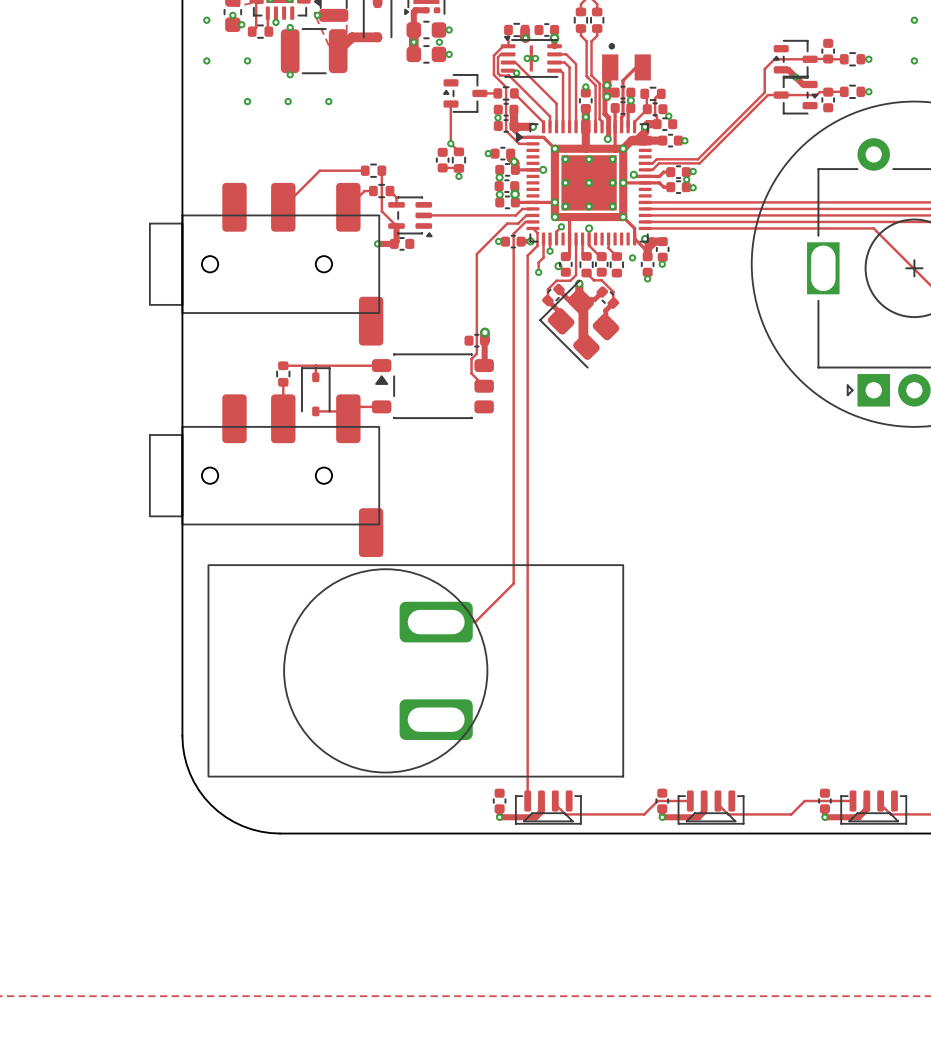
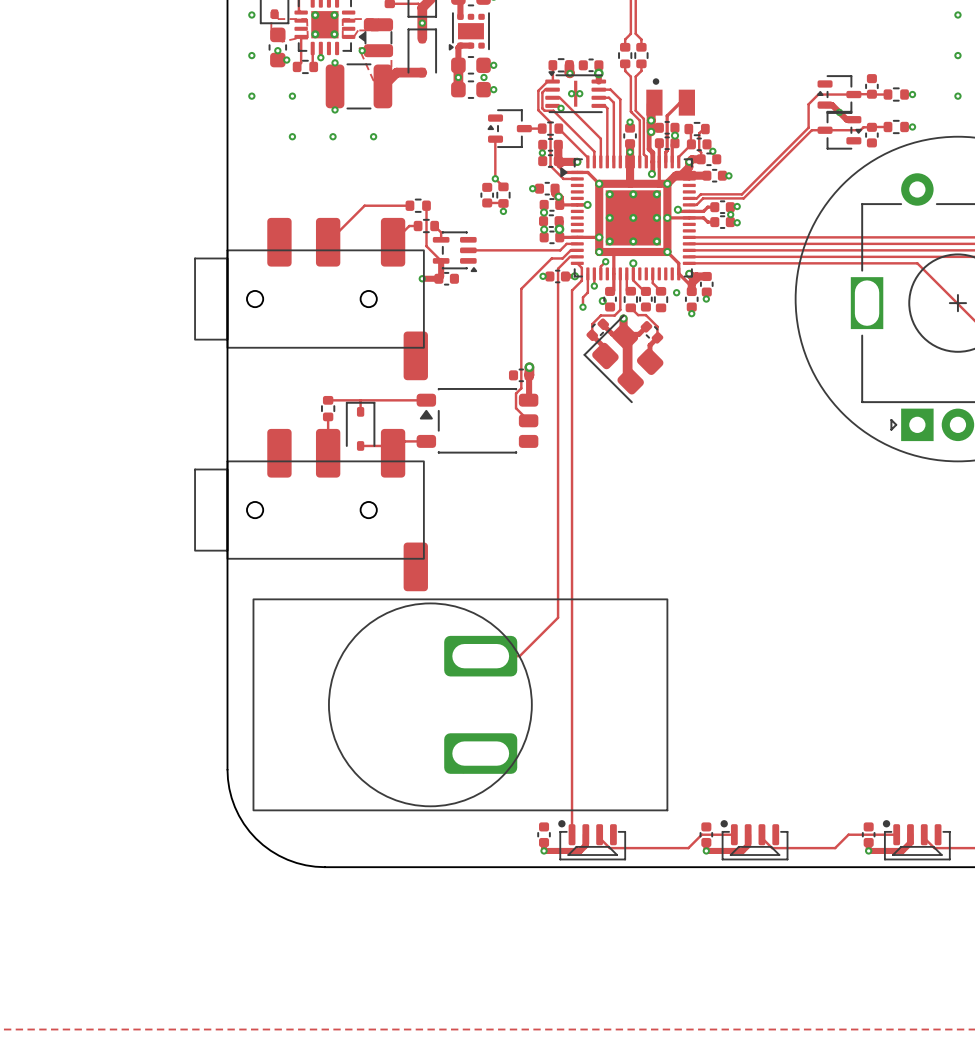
part footprint: [515, 790, 582, 825] -> [558, 820, 627, 861]
part footprint: [677, 790, 745, 825] -> [720, 820, 789, 861]
part footprint: [840, 790, 908, 825] -> [882, 820, 951, 861]

